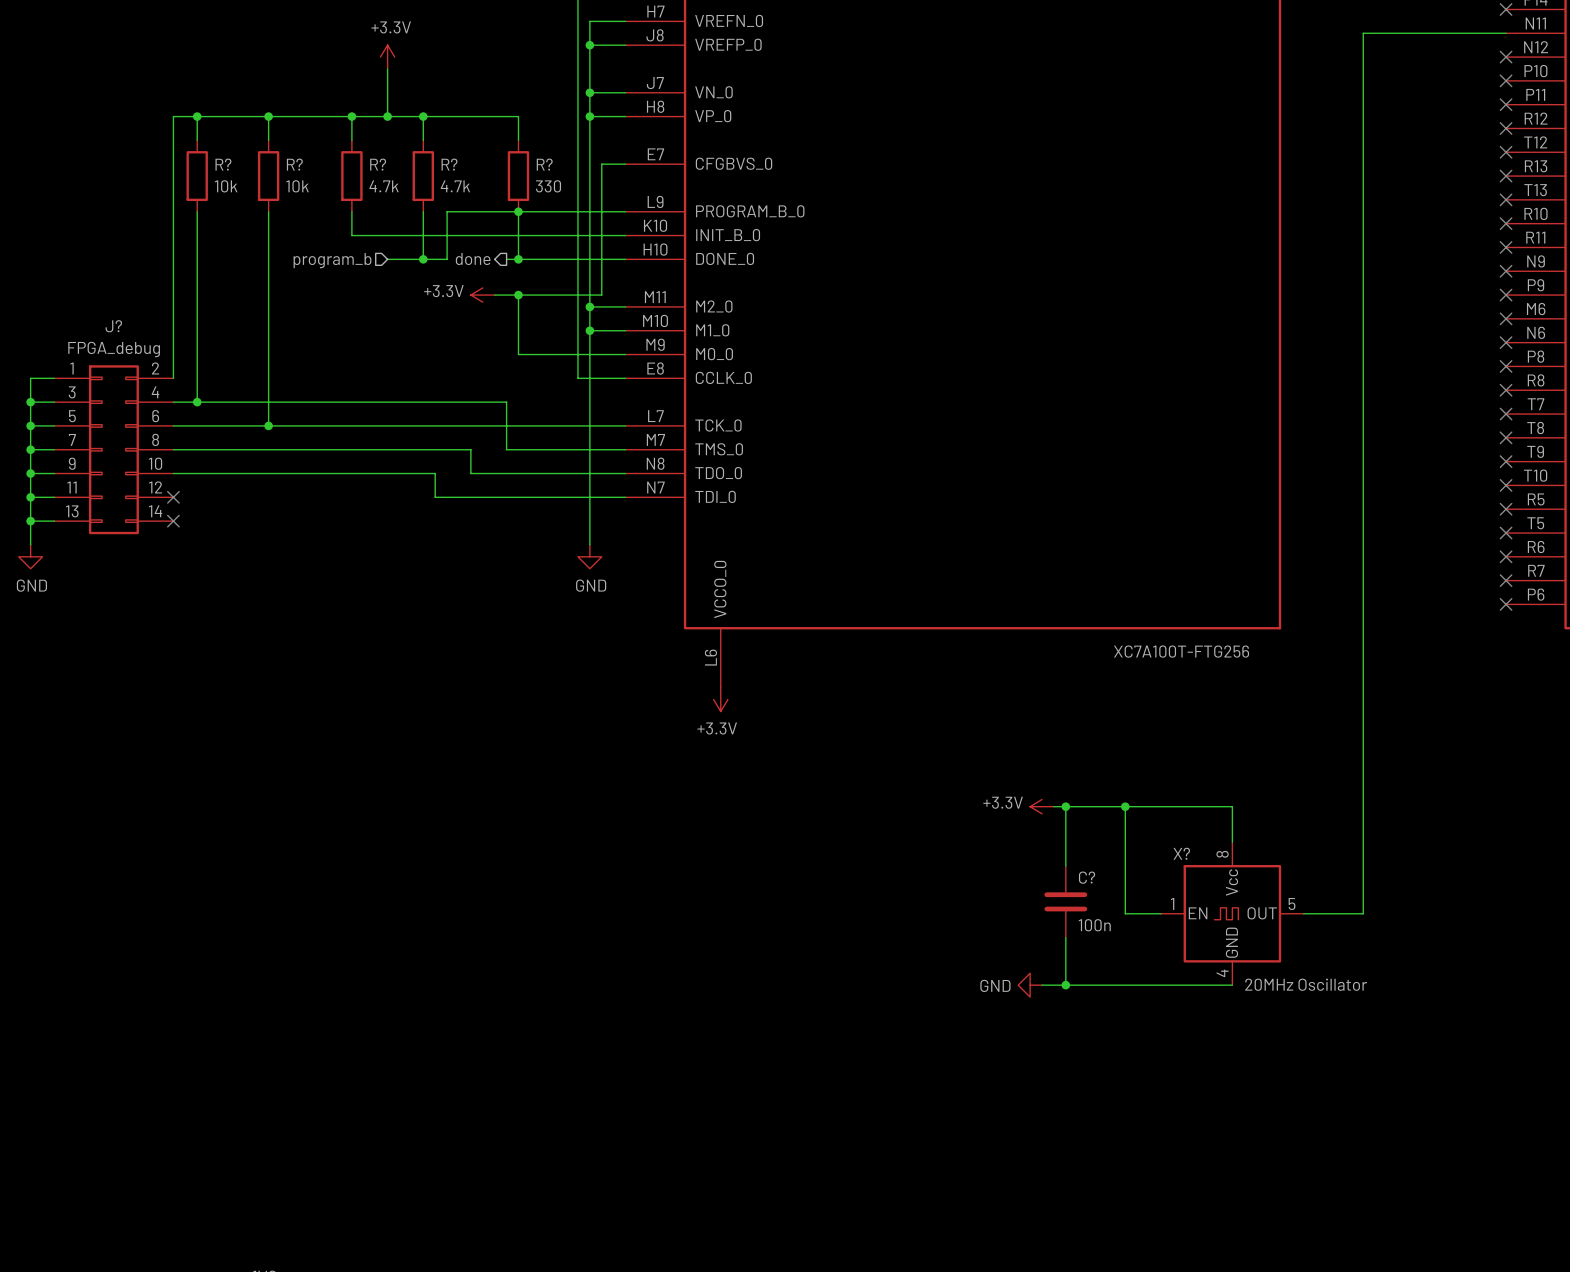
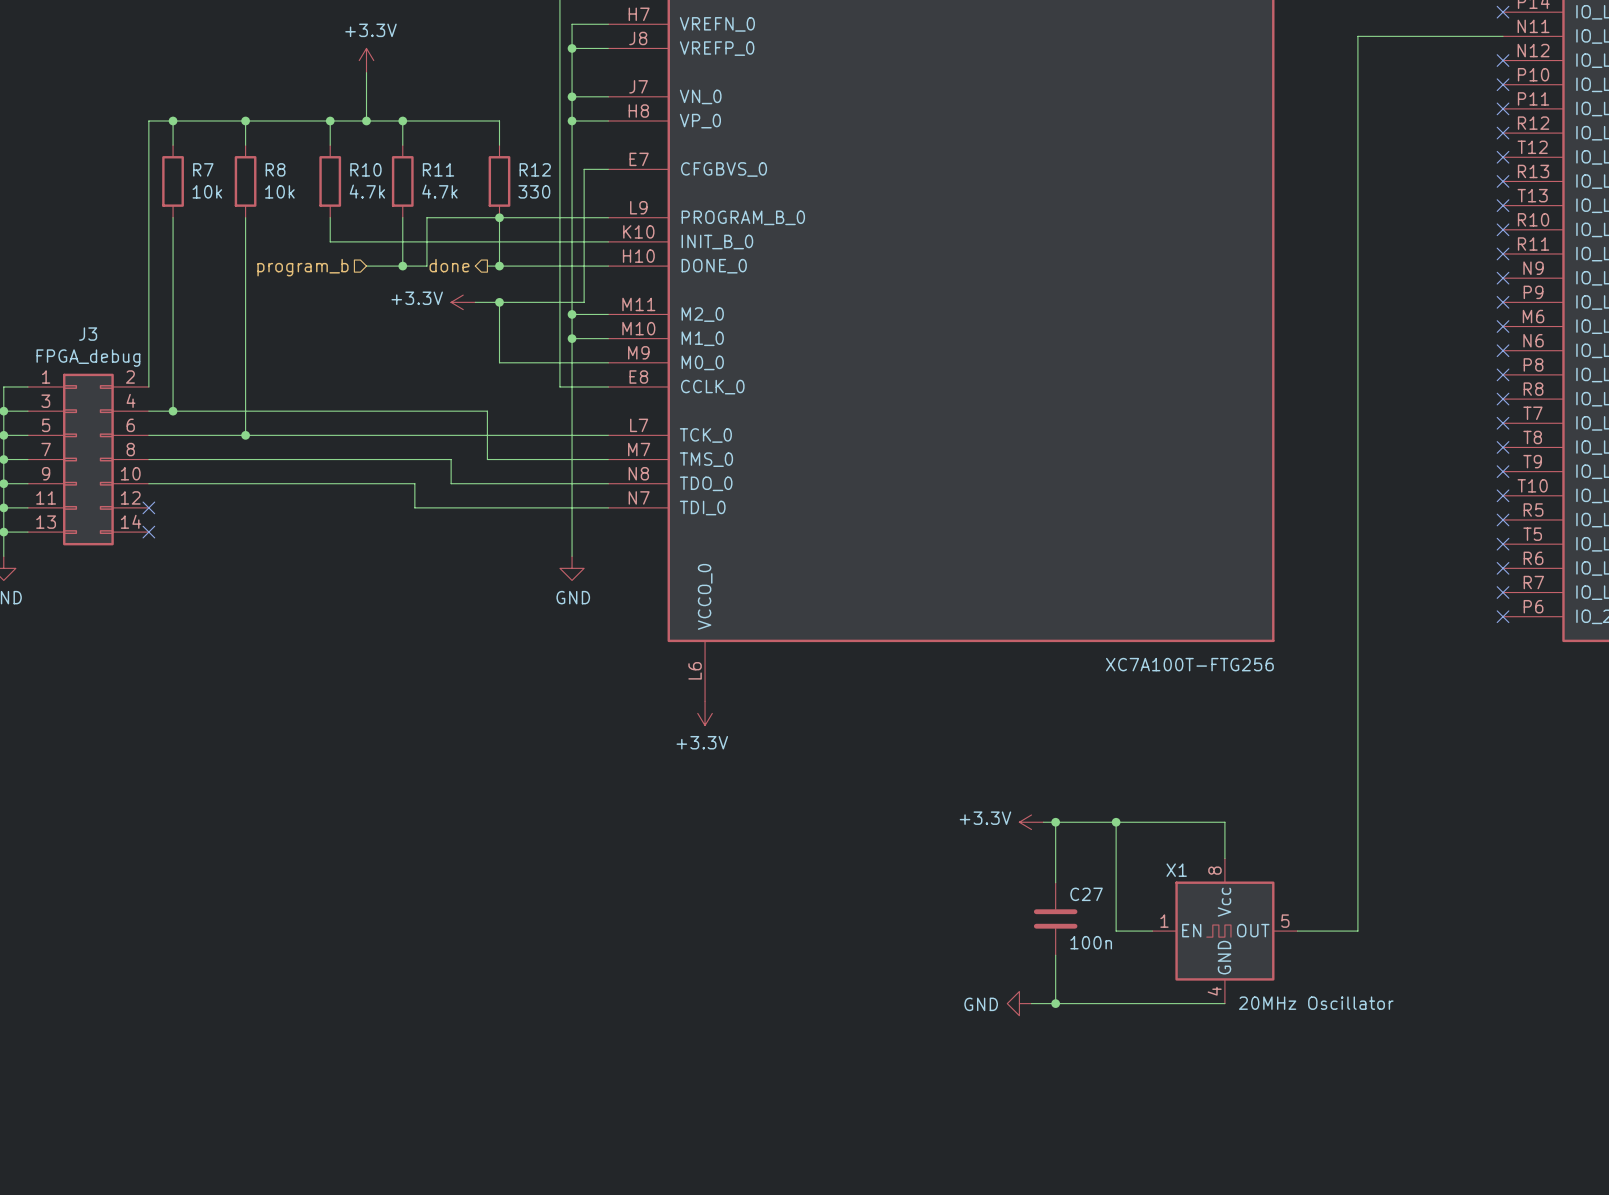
R? name: R? (223, 164) -> R7 (203, 169)
R? name: R? (294, 164) -> R8 (275, 169)
R? name: R? (378, 164) -> R10 (365, 169)
R? name: R? (449, 164) -> R11 (438, 169)
R? name: R? (544, 164) -> R12 (535, 169)
J? name: J? (113, 326) -> J3 (88, 334)
X? name: X? (1181, 853) -> X1 (1176, 870)
C? name: C? (1087, 877) -> C27 (1086, 894)

